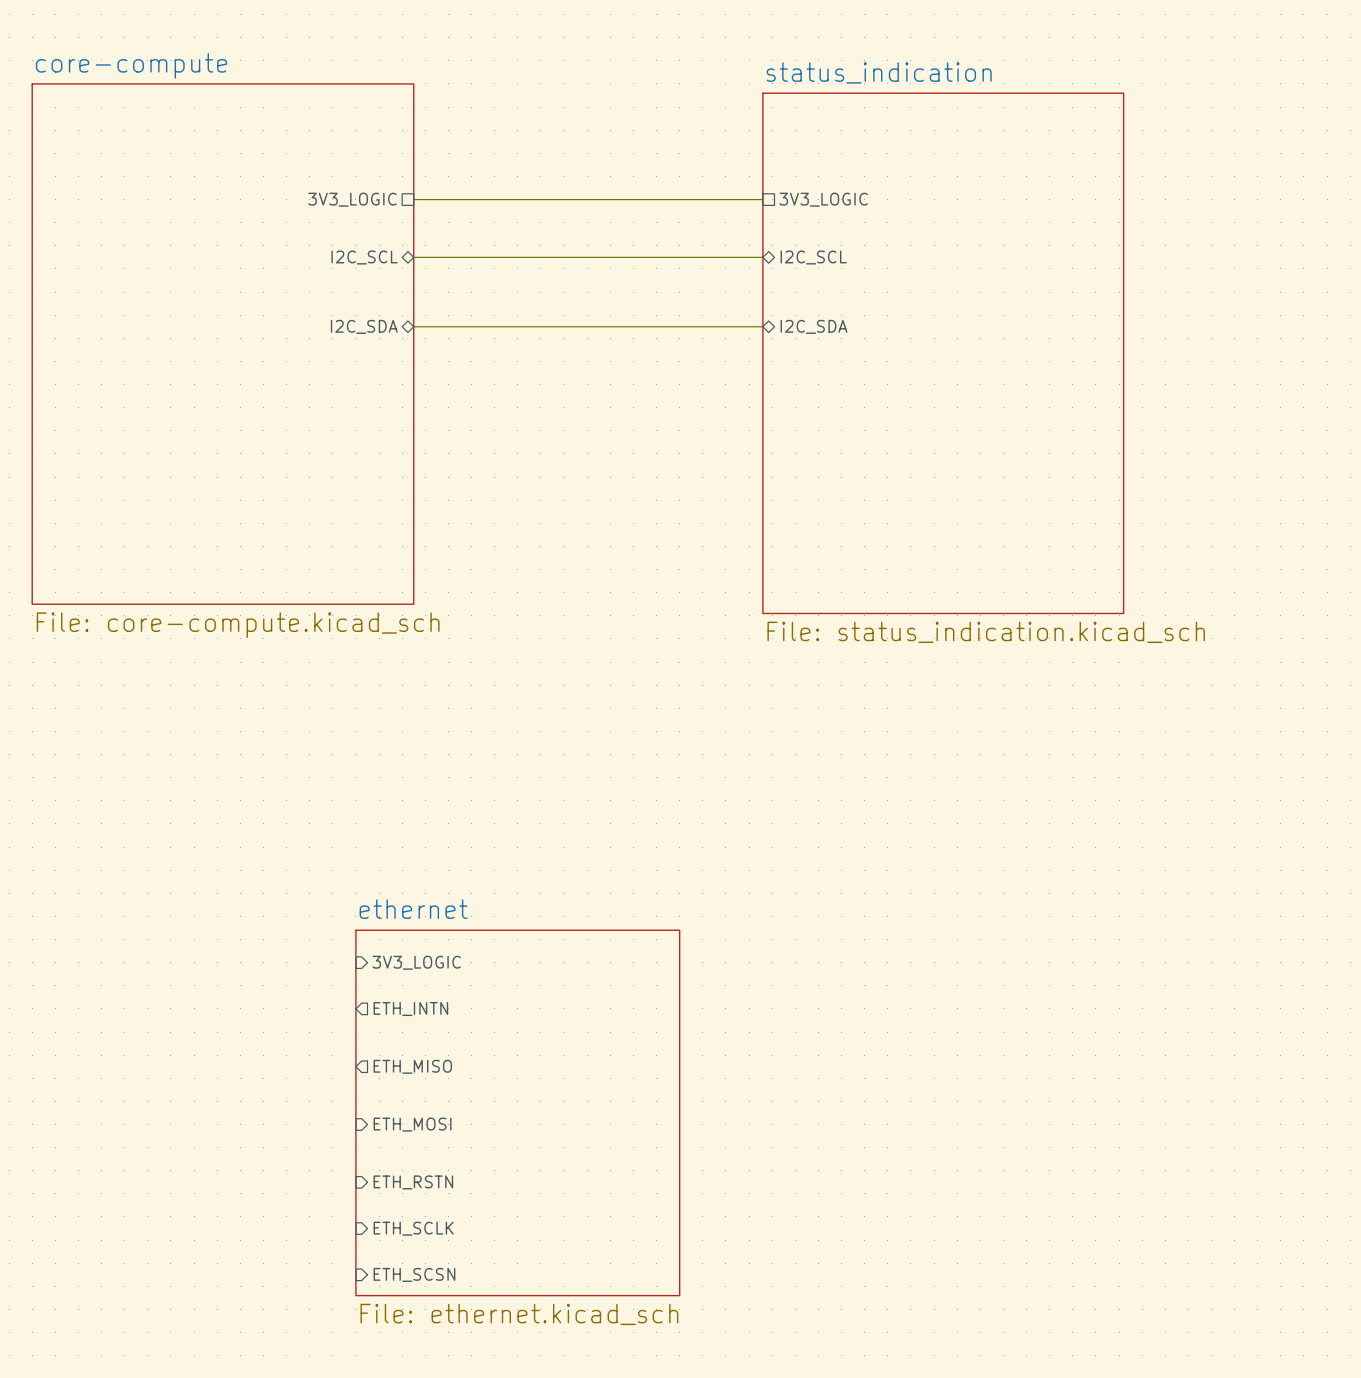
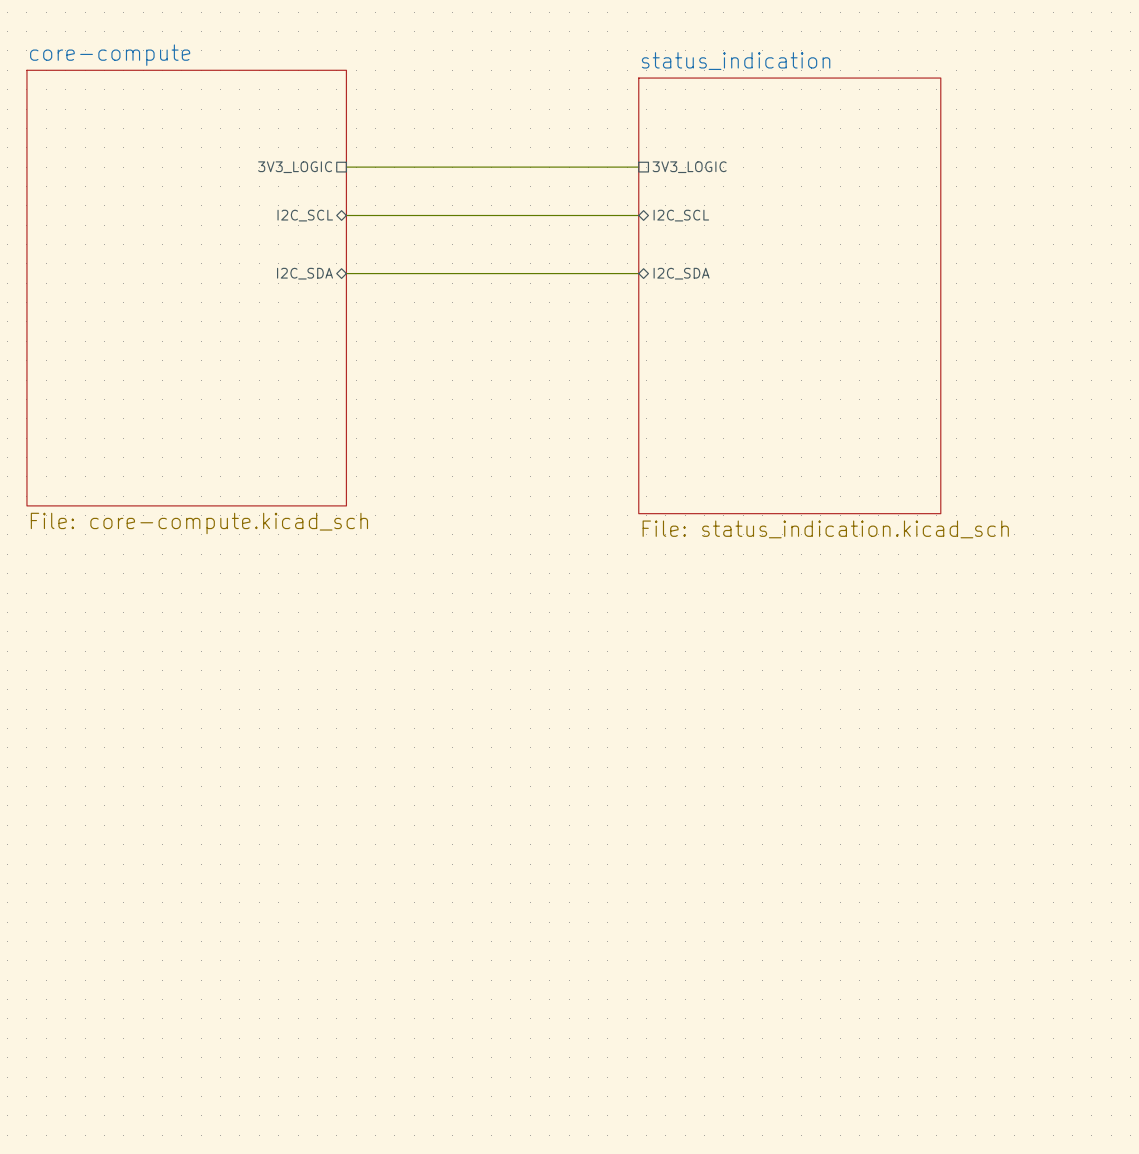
sheet pin: 3V3_LOGIC (416, 962) -> none
sheet pin: ETH_INTN (410, 1009) -> none
sheet pin: ETH_MISO (412, 1066) -> none
sheet ethernet: File: ethernet.kicad_sch (517, 1112) -> none
sheet pin: ETH_MOSI (412, 1124) -> none
sheet pin: ETH_RSTN (413, 1182) -> none
sheet pin: ETH_SCLK (413, 1228) -> none
sheet pin: ETH_SCSN (414, 1274) -> none

